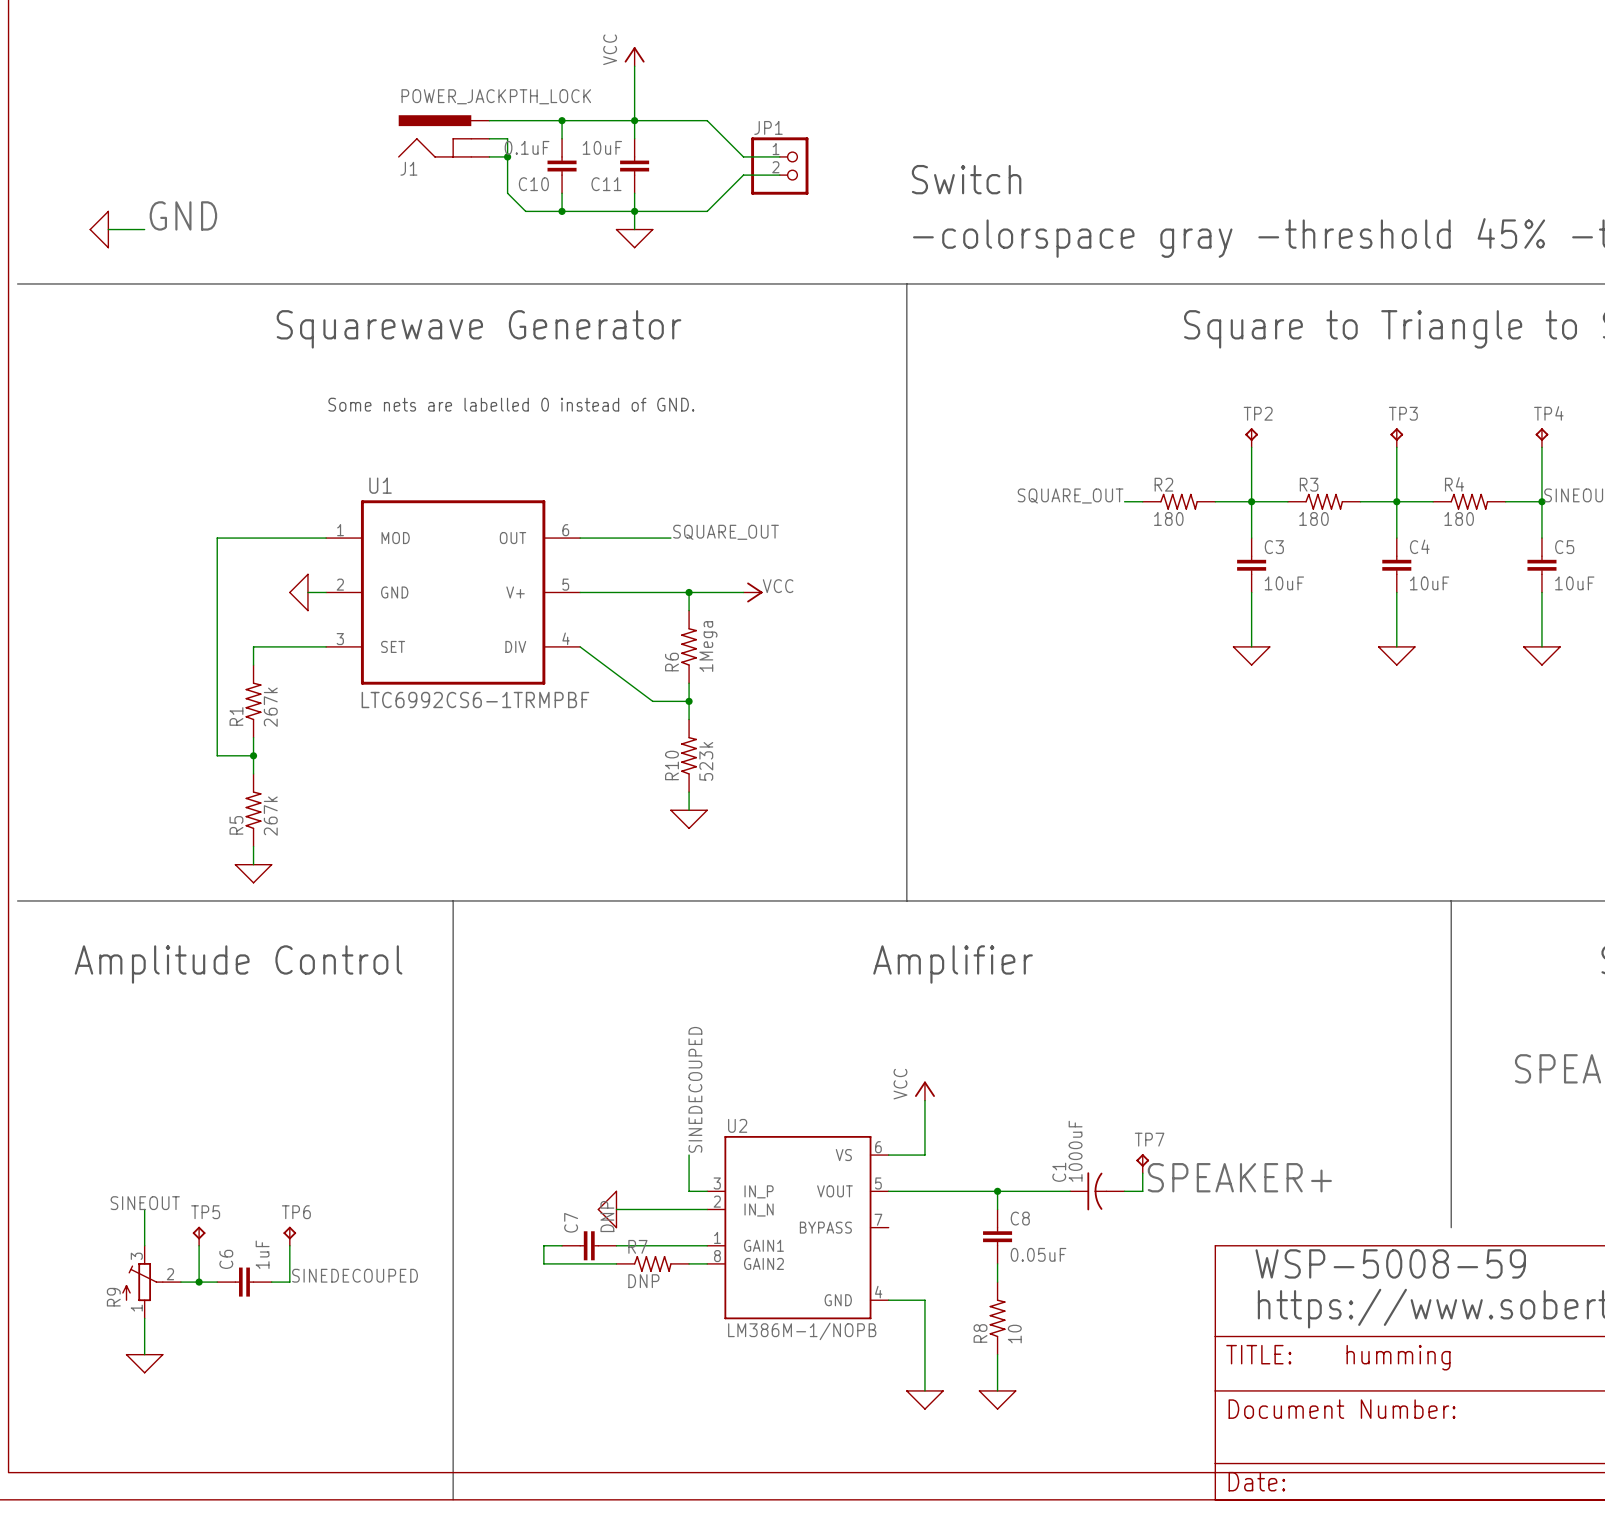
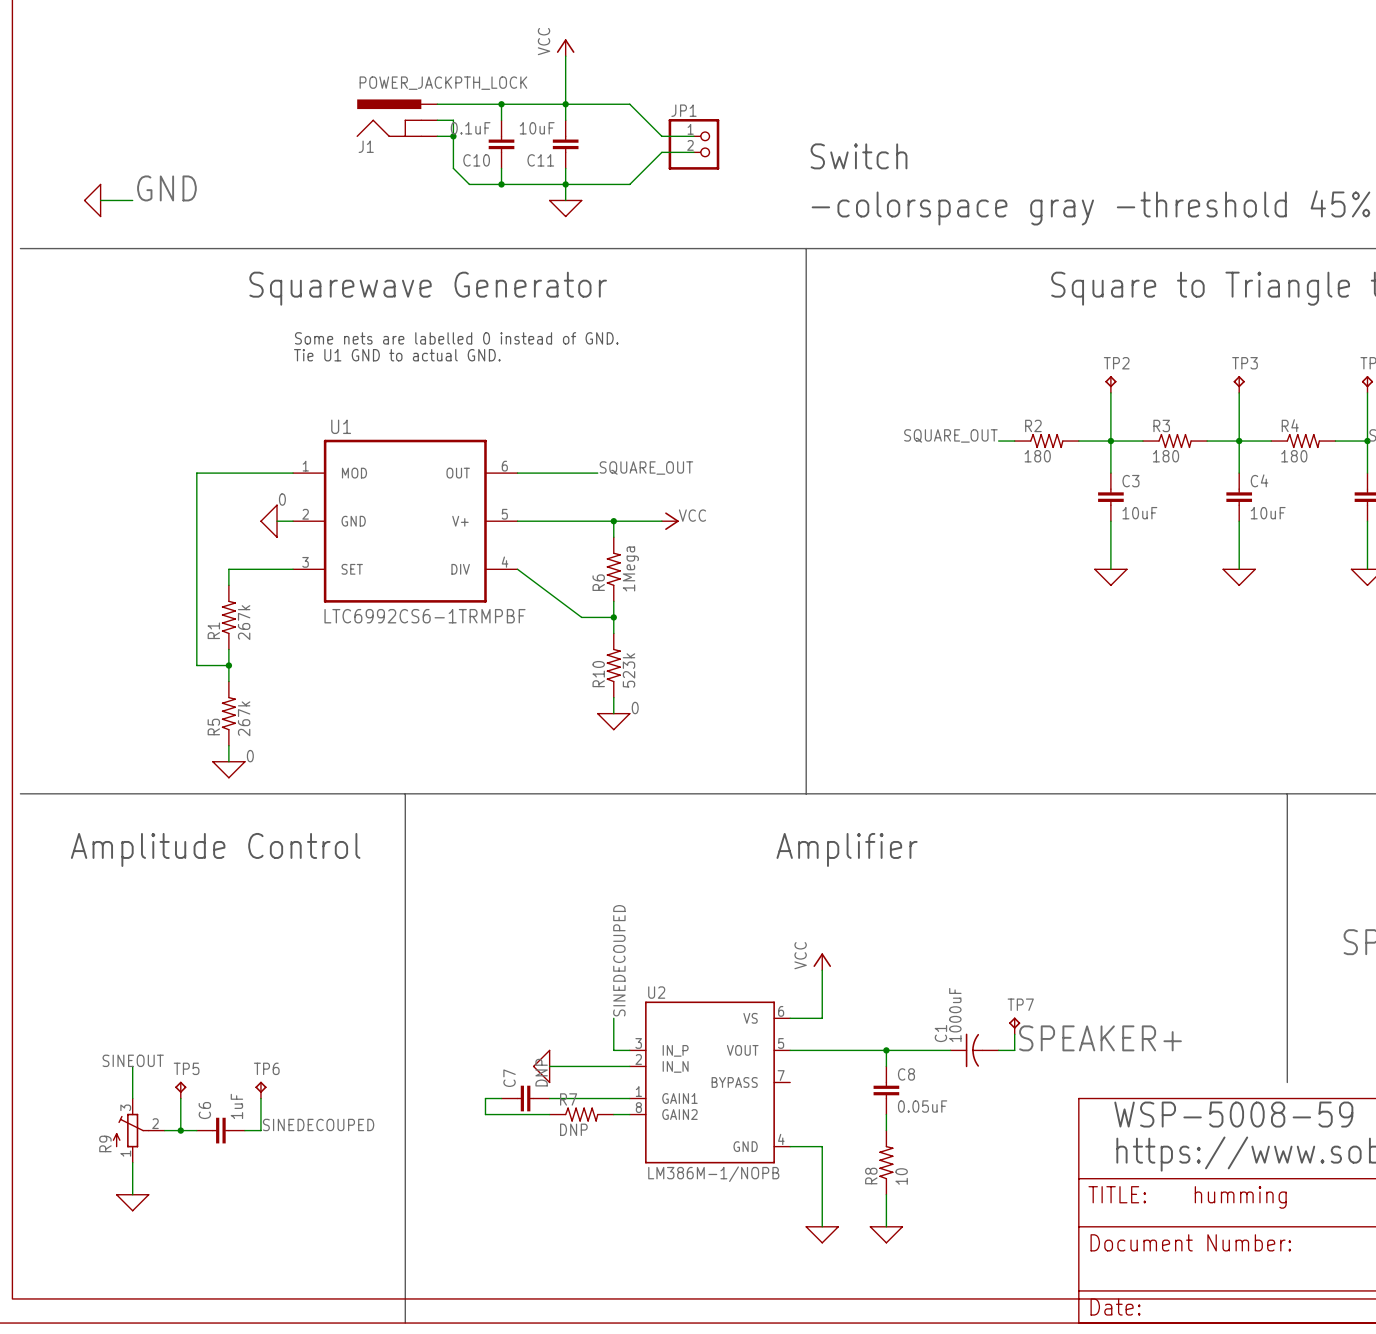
text: none -> Some nets are labelled 0 instead of GND. (456, 338)
text: Some nets are labelled 0 instead of GND. (511, 404) -> Tie U1 GND to actual GND. (397, 355)
label: none -> 0 (282, 499)
label: none -> 0 (635, 708)
label: none -> 0 (250, 756)

